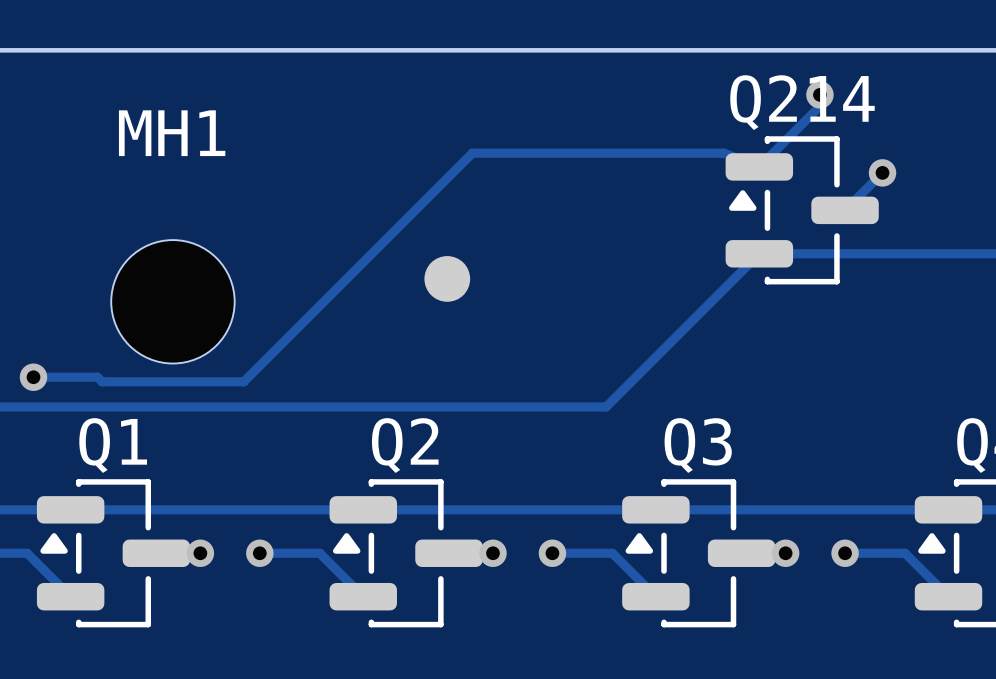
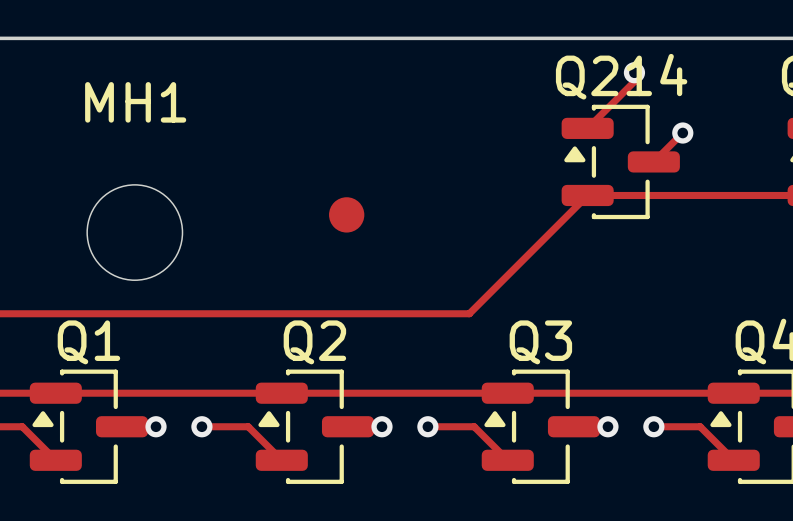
track: (759, 166) (723, 153) (472, 153) (243, 381) (102, 381) (97, 377) (33, 377) -> none
via: (33, 377) -> none

